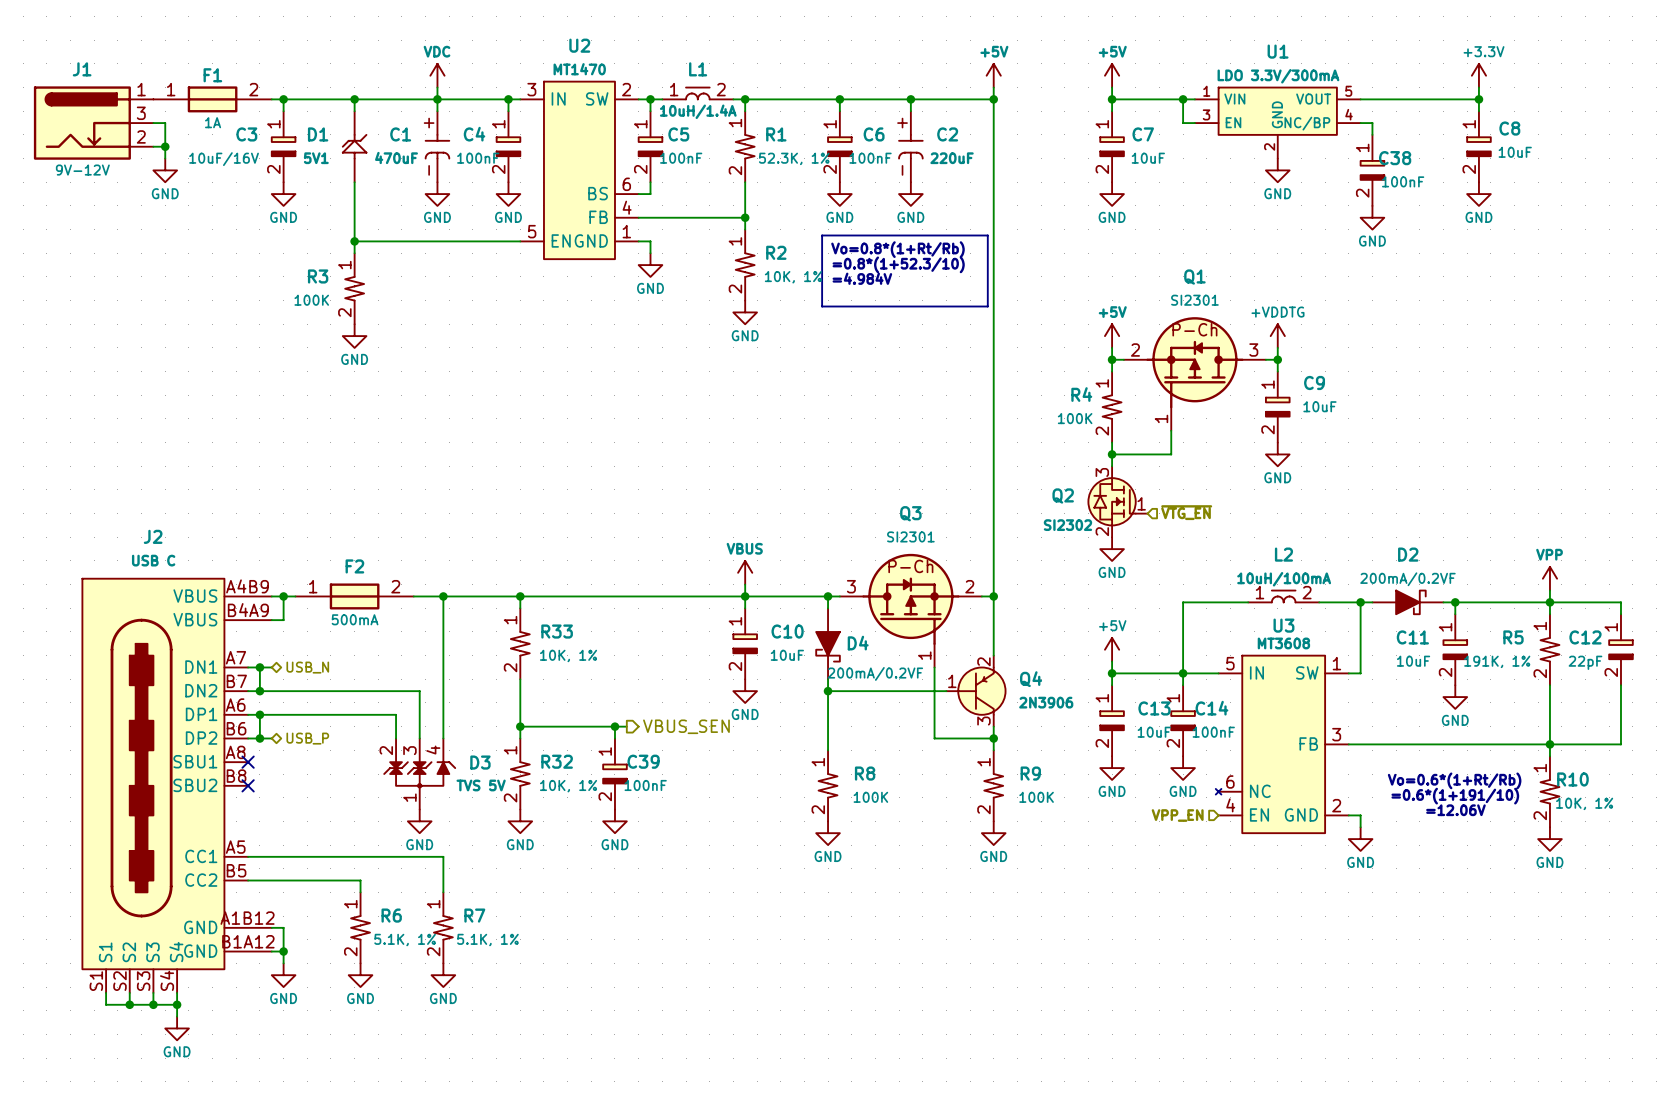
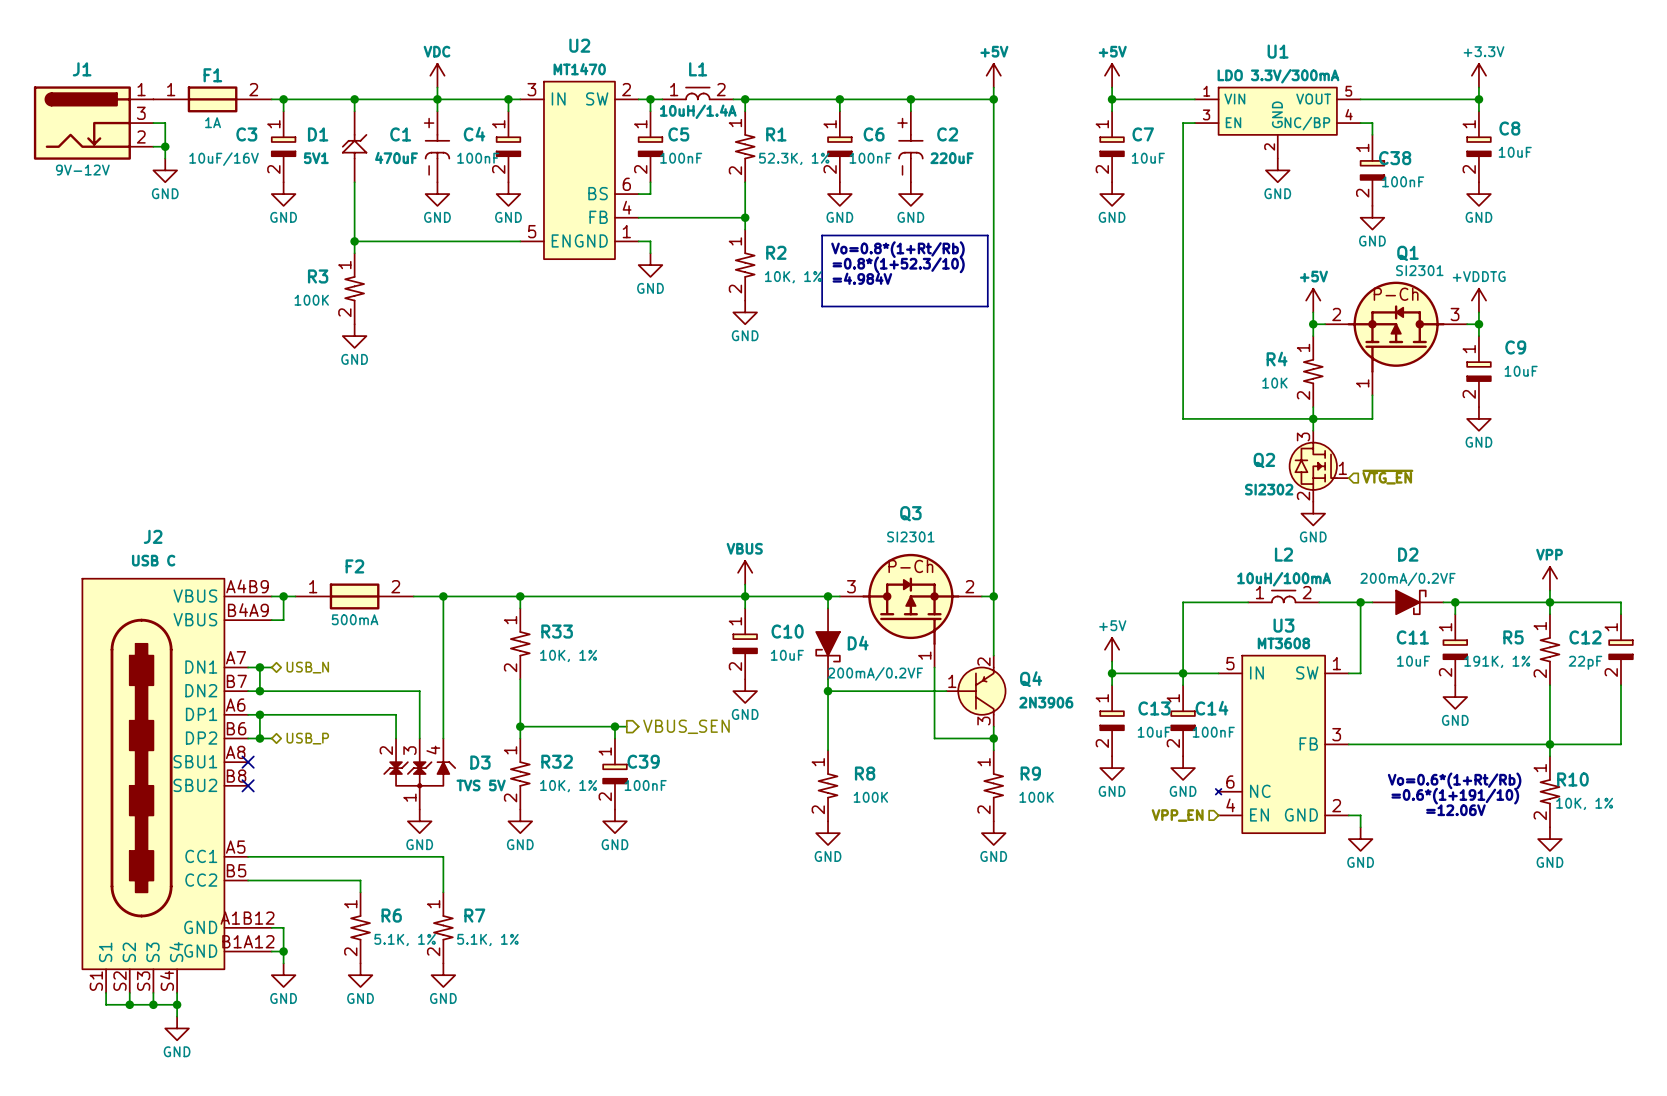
wire: (1183, 99) (1183, 123) -> (1372, 395) (1372, 418) (1183, 418) (1183, 123)
junction: (1183, 99) -> none
Q1 name position: Q1 (1194, 277) -> Q1 (1407, 253)
Q1 value position: SI2301 (1194, 300) -> SI2301 (1419, 270)
junction: none -> (1313, 324)
junction: none -> (1478, 324)
power symbol position: +5V (1112, 336) -> +5V (1313, 300)
power symbol position: +VDDTG (1277, 336) -> +VDDTG (1478, 300)
wire: (1112, 347) (1112, 371) -> (1313, 312) (1313, 336)
wire: (1277, 347) (1277, 371) -> (1478, 312) (1478, 336)
wire: (1112, 359) (1123, 359) -> (1313, 324) (1325, 324)
junction: (1112, 359) -> none
junction: (1277, 359) -> none
Q1 position: (1194, 373) -> (1396, 338)
R4 name position: R4 (1081, 394) -> R4 (1277, 359)
R4 position: (1112, 407) -> (1313, 371)
C9 position: (1277, 407) -> (1478, 371)
R4 value: 100K (1075, 418) -> 10K (1274, 383)
junction: none -> (1313, 418)
power symbol: none -> GND (1478, 418)
wire: (1171, 430) (1171, 454) (1112, 454) -> none
wire: (1112, 442) (1112, 466) -> (1313, 407) (1313, 430)
junction: (1112, 454) -> none
power symbol position: GND (1277, 454) -> GND (1313, 513)
Q2 position: (1117, 501) -> (1319, 466)
hierarchical label position: ~{VTG_EN} (1186, 512) -> ~{VTG_EN} (1387, 477)
power symbol: GND (1112, 549) -> none

